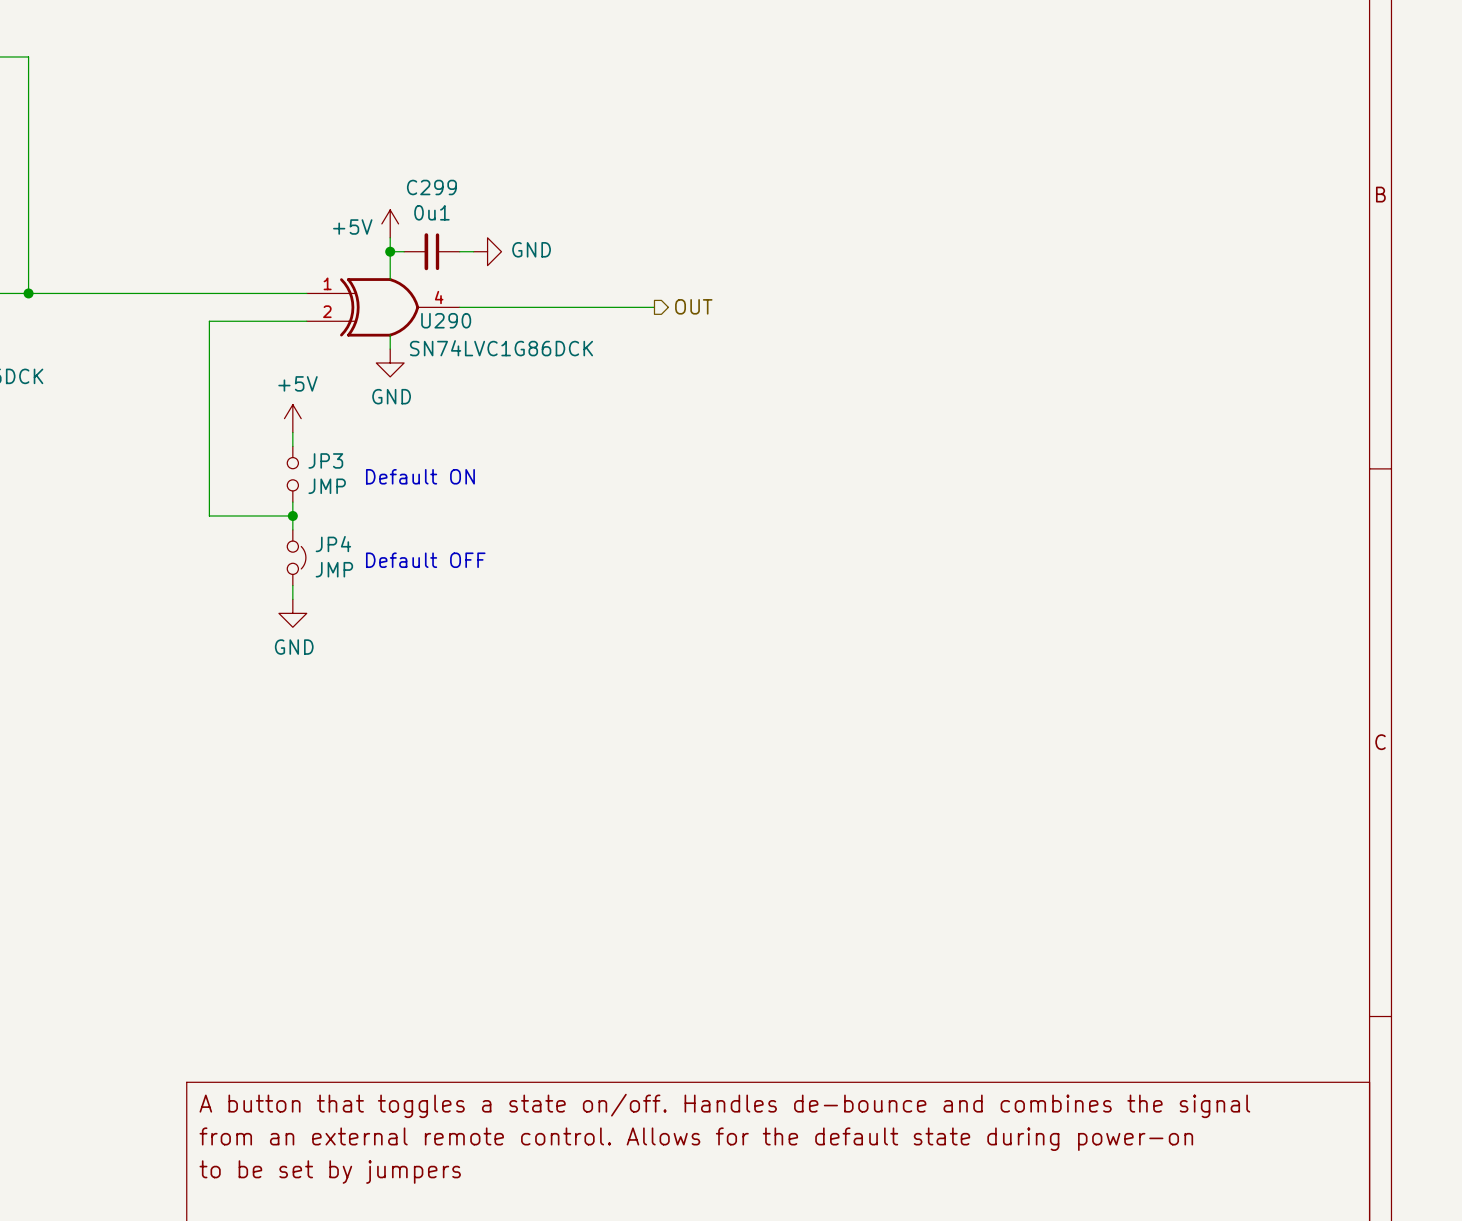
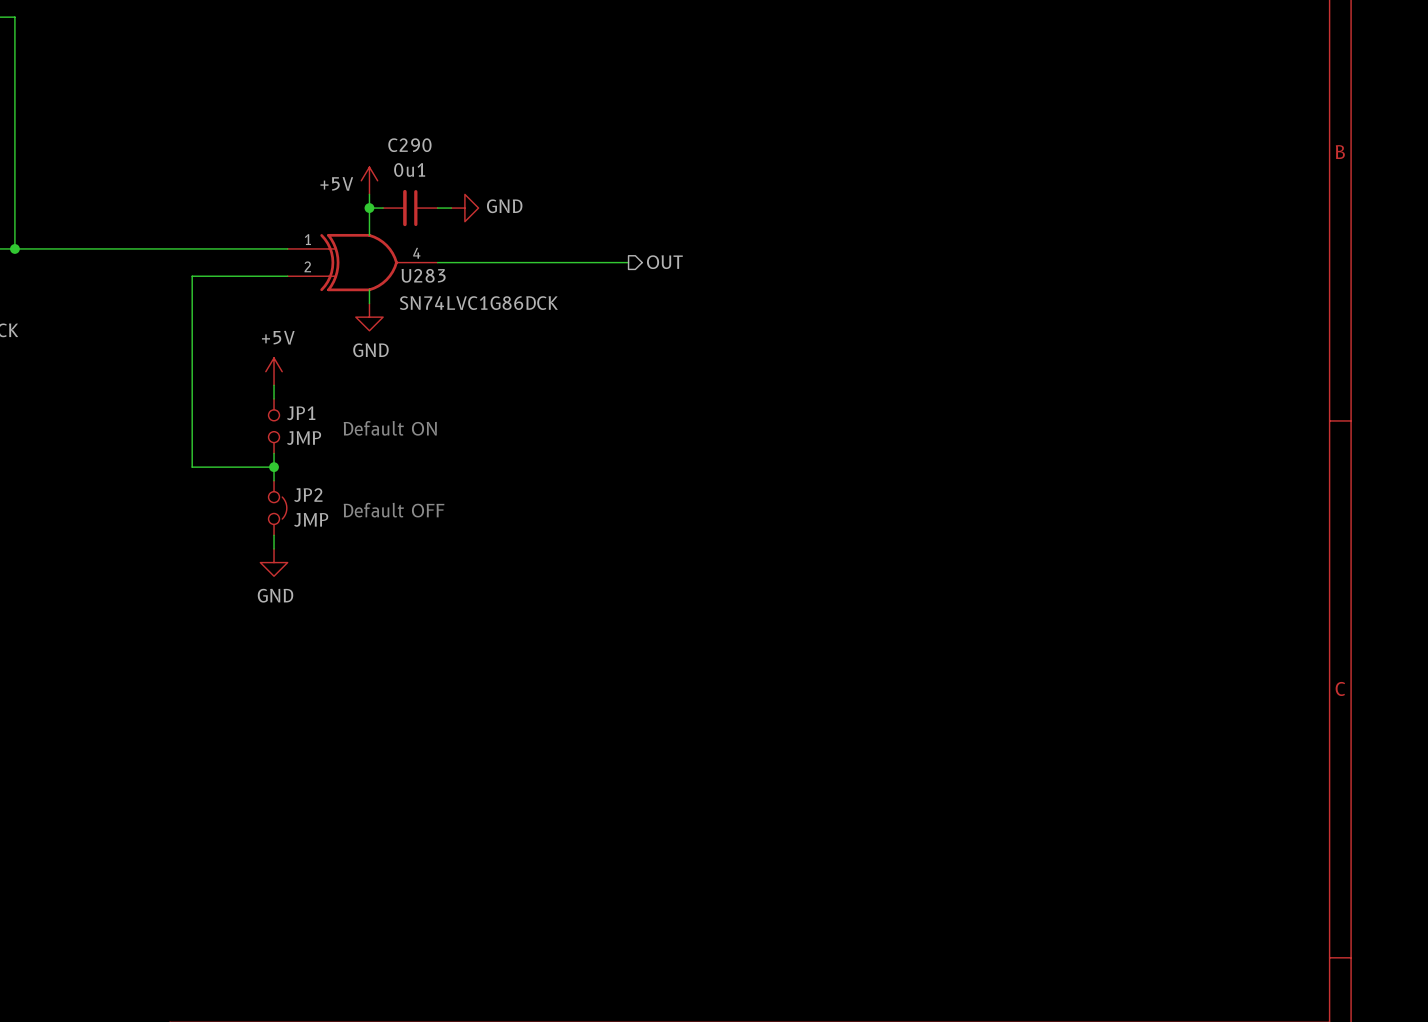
C299 name: C299 (431, 187) -> C290 (409, 145)
U290 name: U290 (446, 320) -> U283 (423, 275)
JP3 name: JP3 (325, 460) -> JP1 (301, 413)
JP4 name: JP4 (333, 544) -> JP2 (308, 495)

